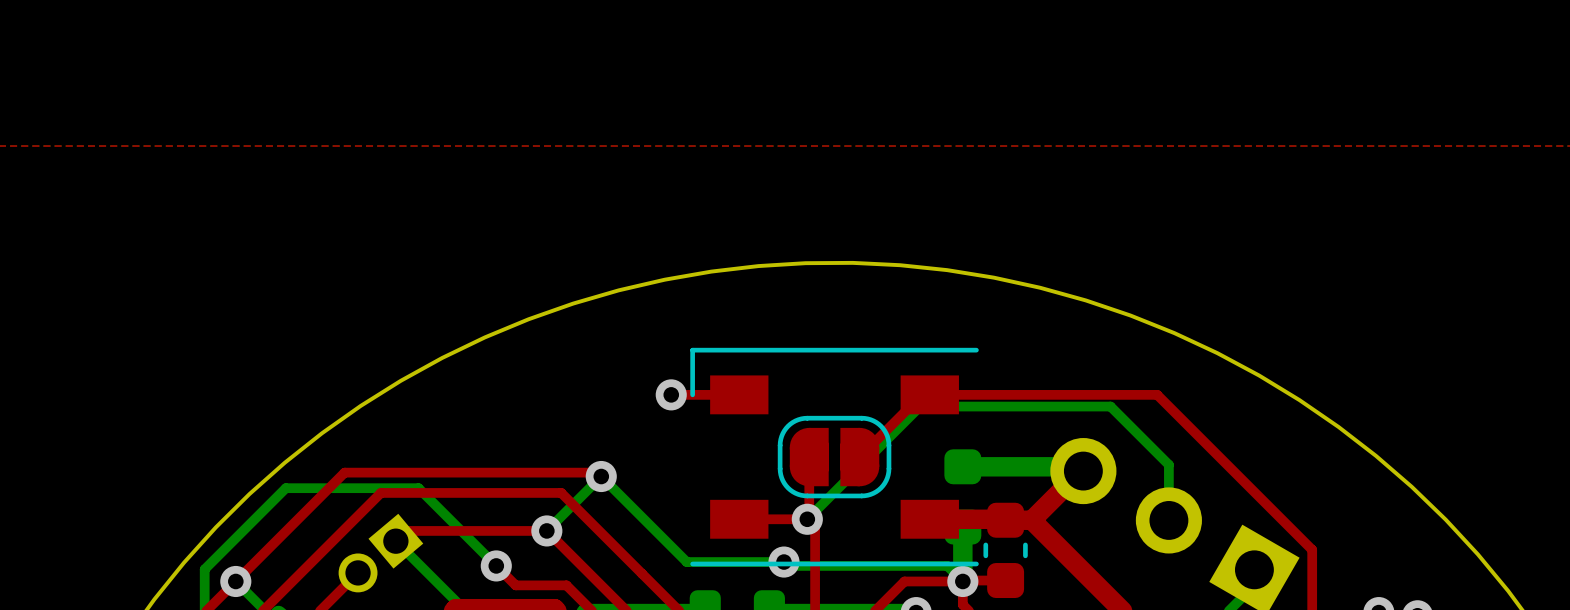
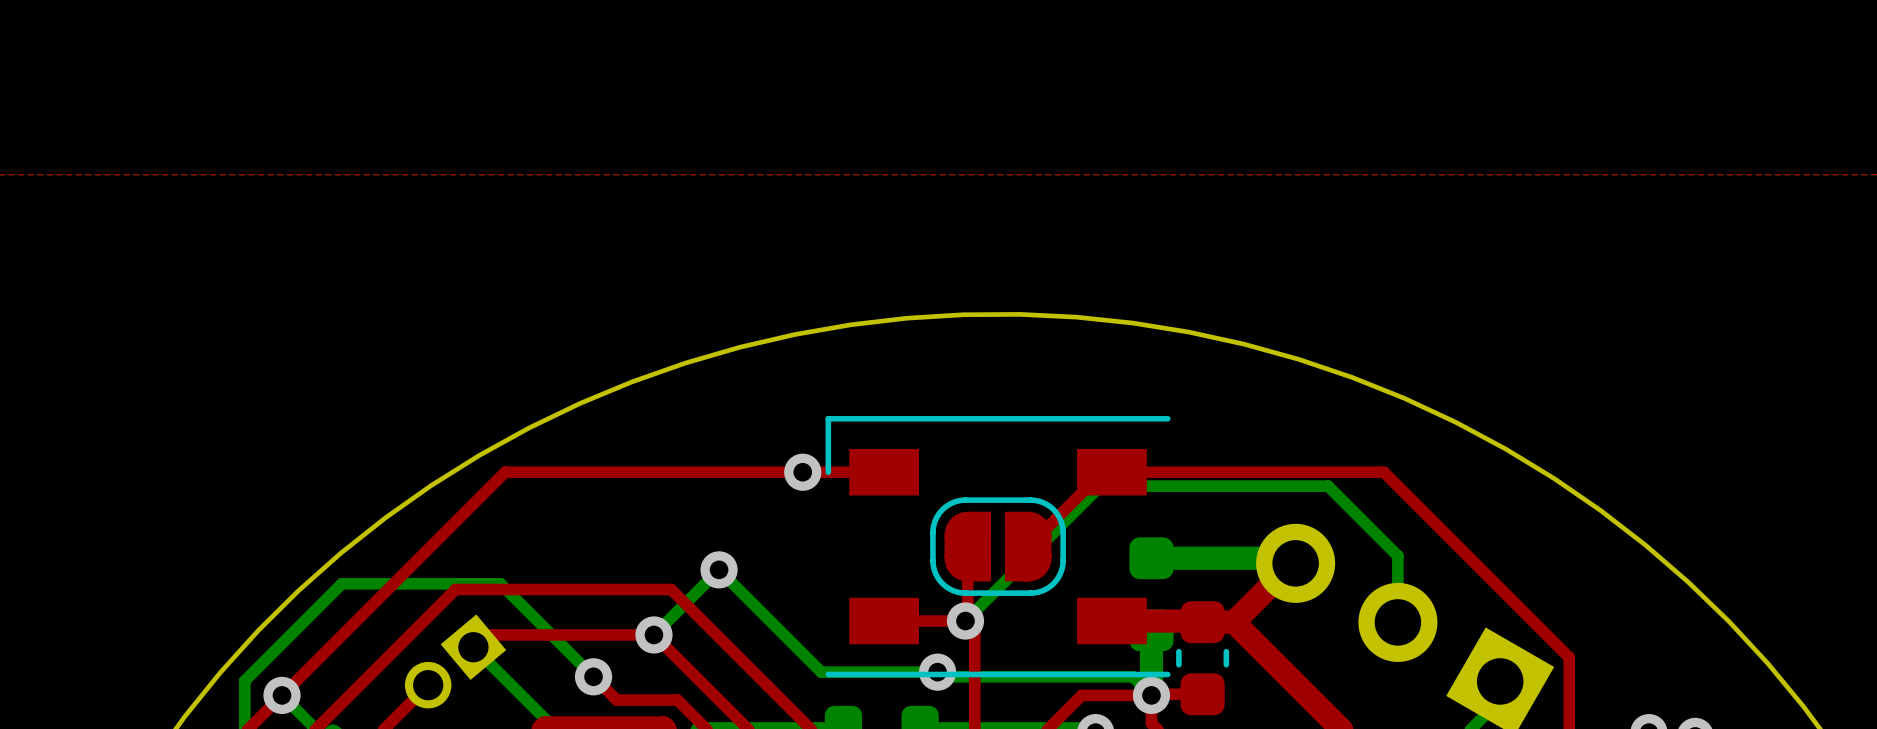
top track: (344, 472) (597, 472) (601, 476) -> (412, 565) (505, 472) (802, 472)

